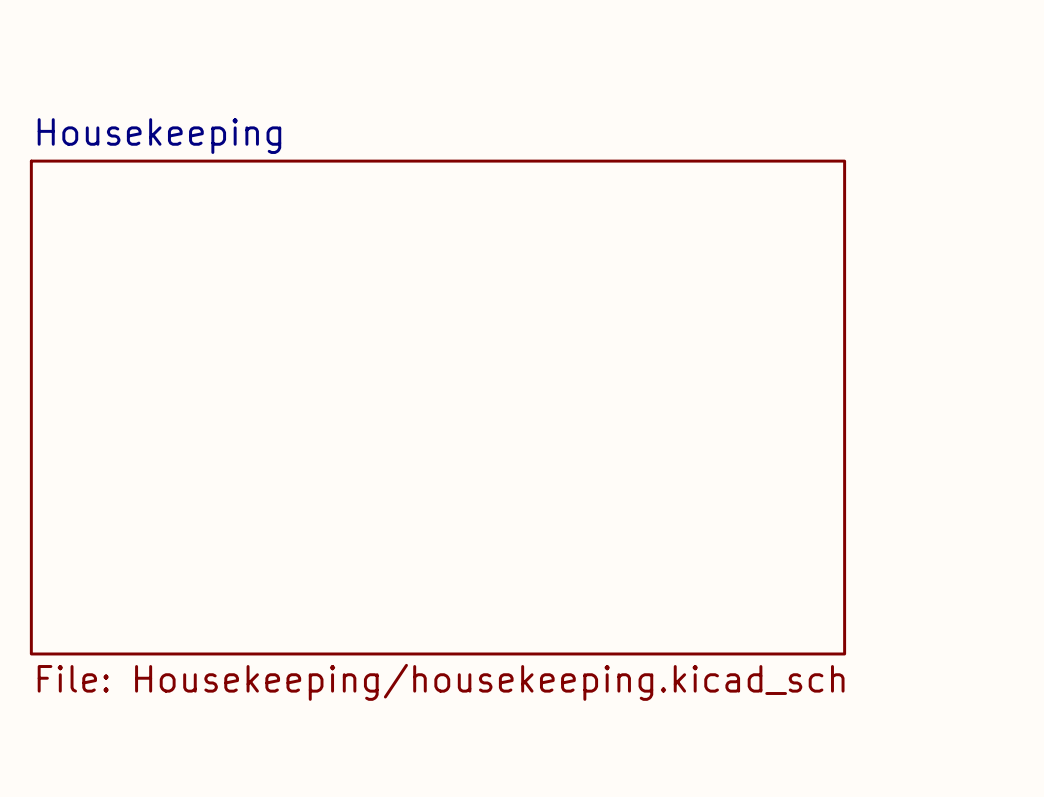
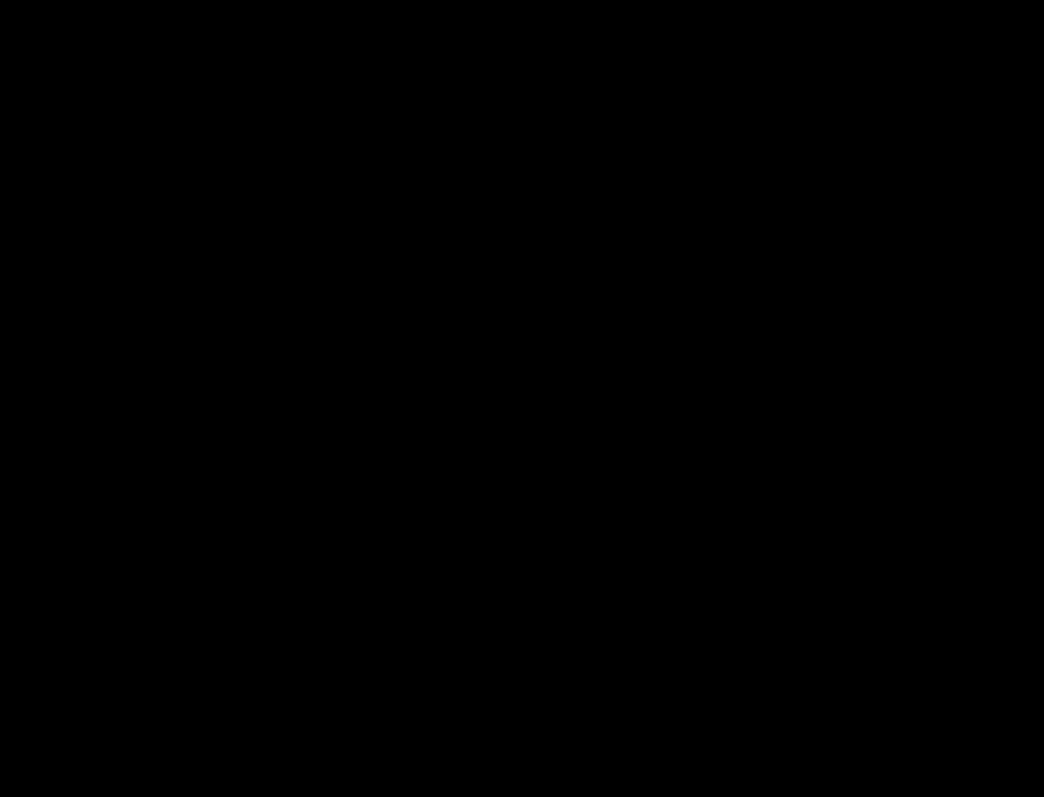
sheet Housekeeping: File: Housekeeping/housekeeping.kicad_sch (437, 407) -> none

